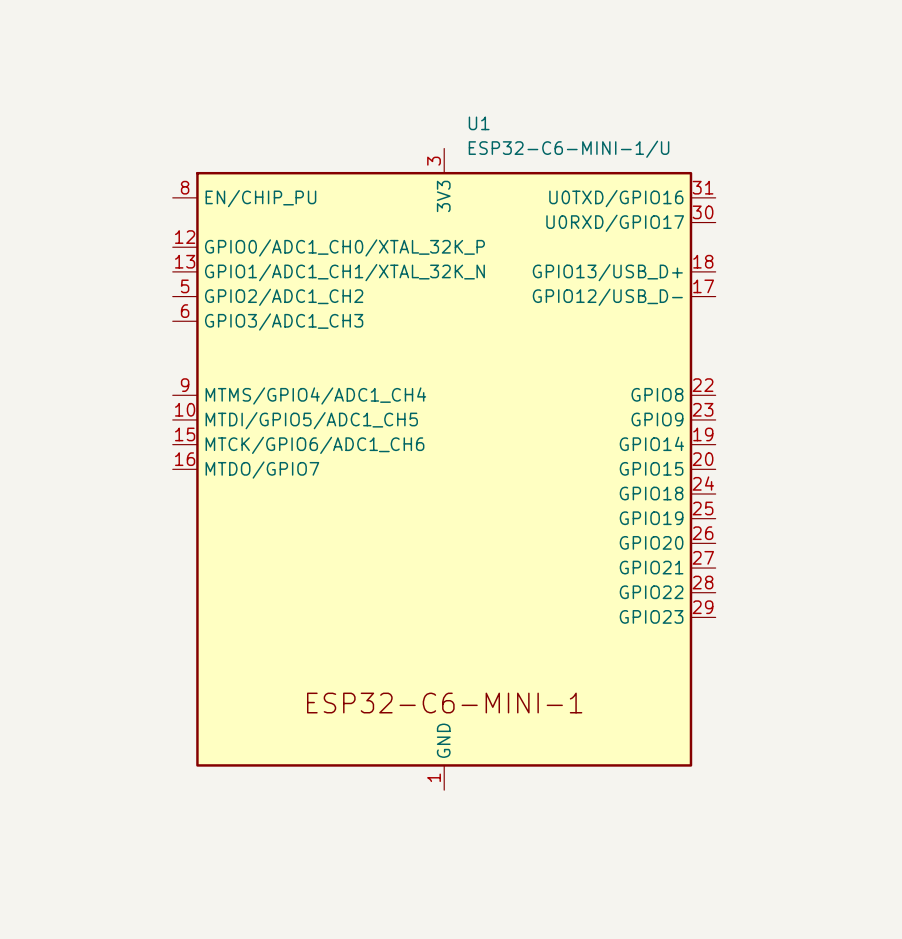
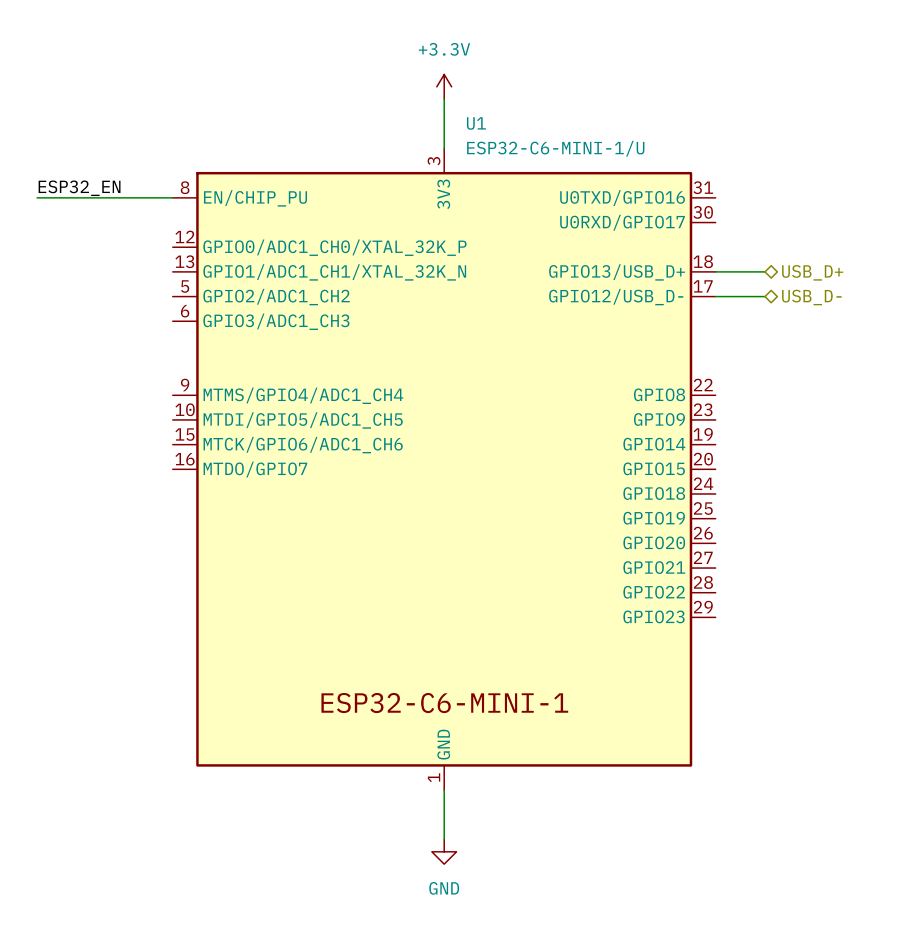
power symbol: none -> +3.3V (444, 86)
wire: none -> (444, 99) (444, 148)
label: none -> ESP32_EN (79, 188)
wire: none -> (37, 197) (172, 197)
wire: none -> (715, 271) (765, 271)
hierarchical label: none -> USB_D+ (812, 272)
wire: none -> (715, 296) (765, 296)
hierarchical label: none -> USB_D- (811, 297)
wire: none -> (444, 790) (444, 839)
power symbol: none -> GND (444, 851)

